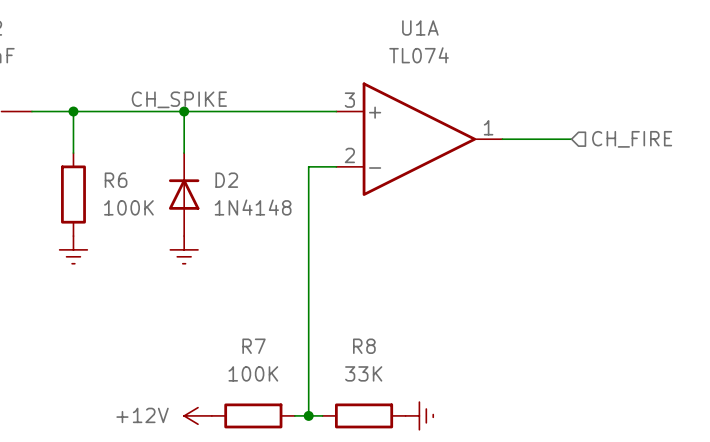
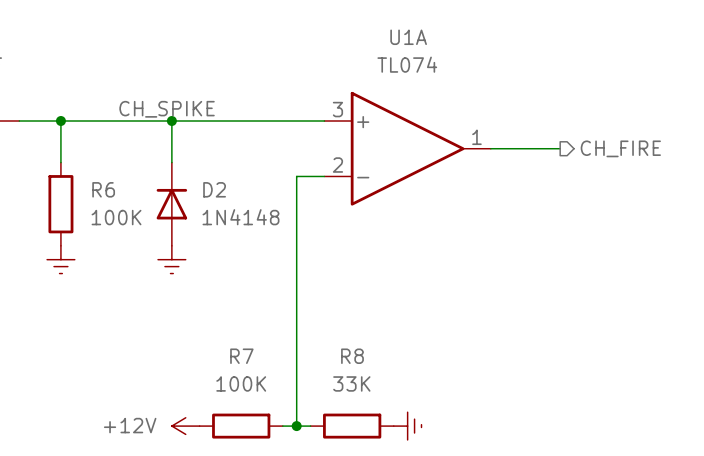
hierarchical label shape: input (632, 139) -> output (620, 148)

